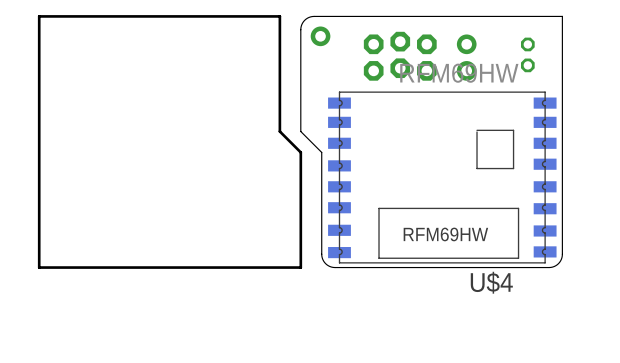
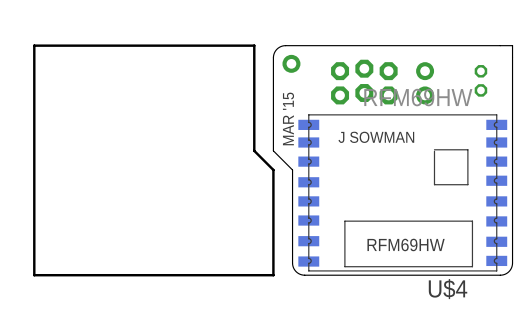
text: none -> MAR '15 (288, 118)
text: none -> J SOWMAN (376, 137)

